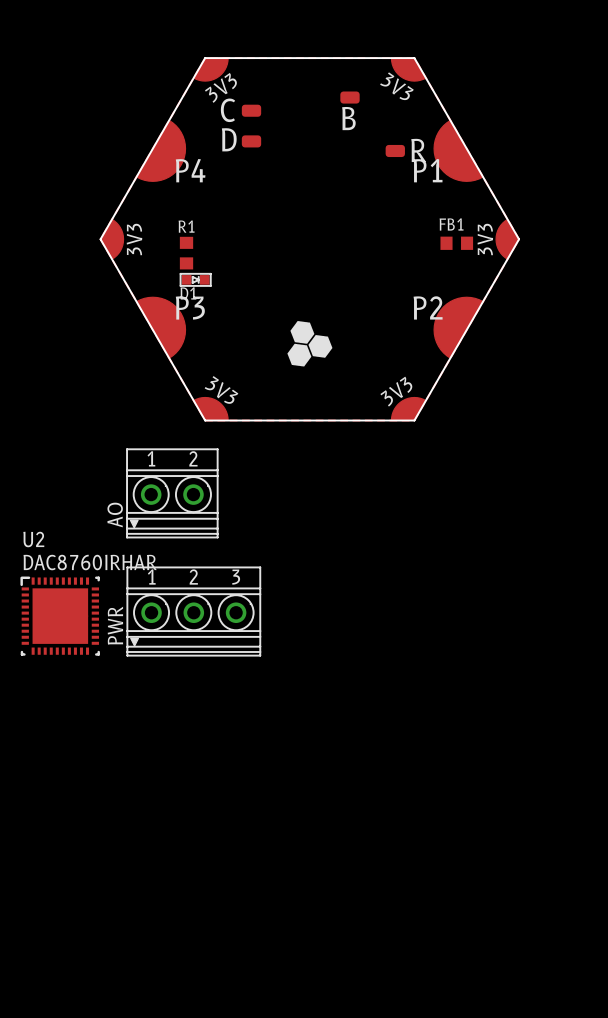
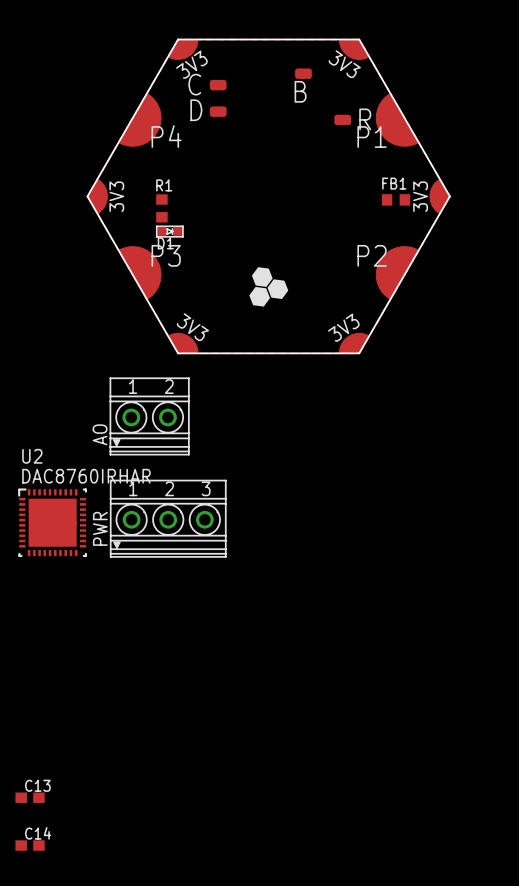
C13: none -> (30, 797)
C14: none -> (30, 845)

